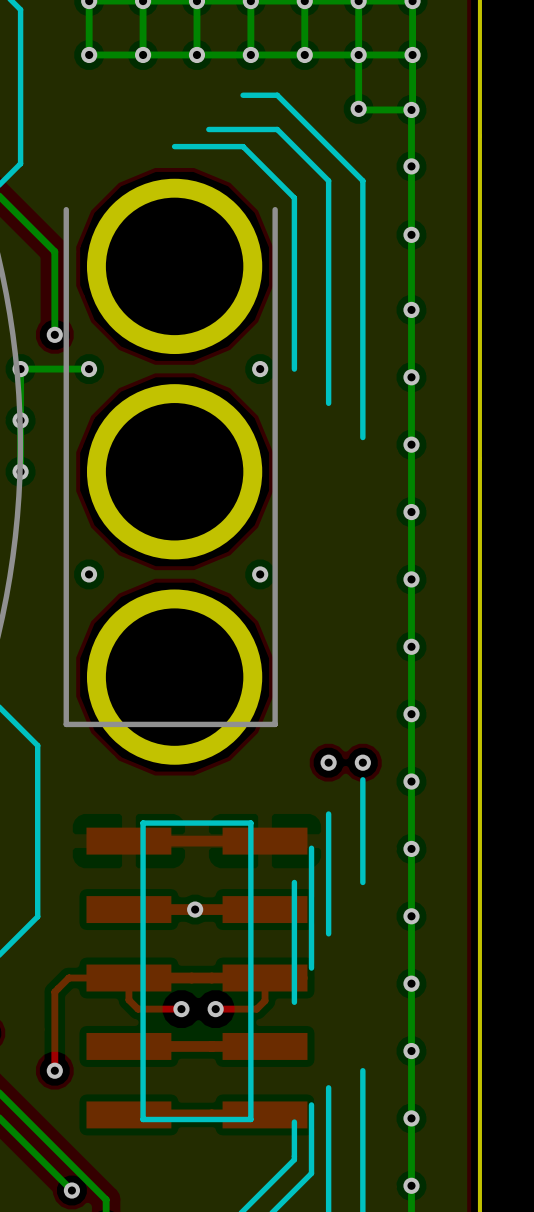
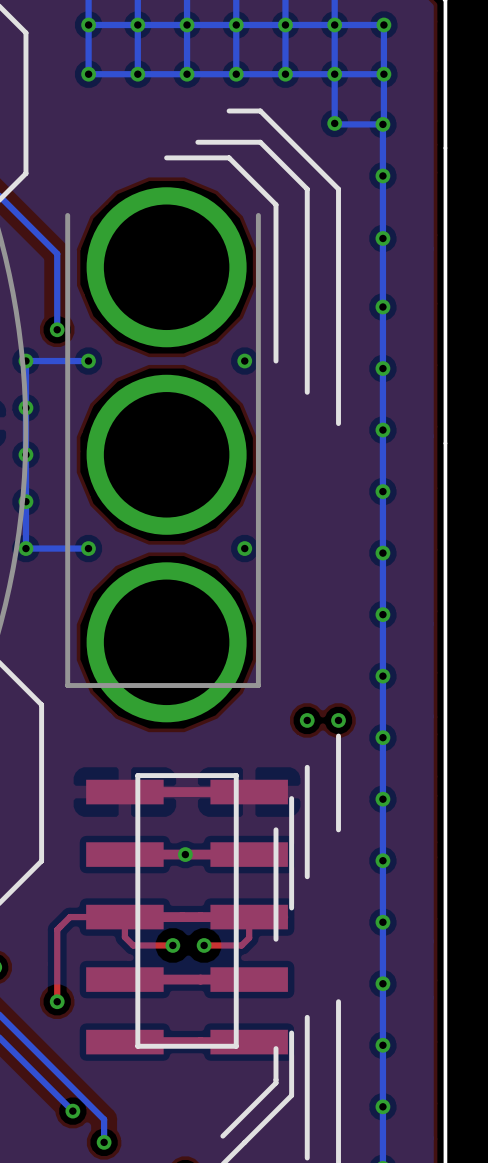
bottom track: none -> (25, 454) (25, 548) (88, 548)
via: none -> (25, 501)
via: none -> (25, 548)

